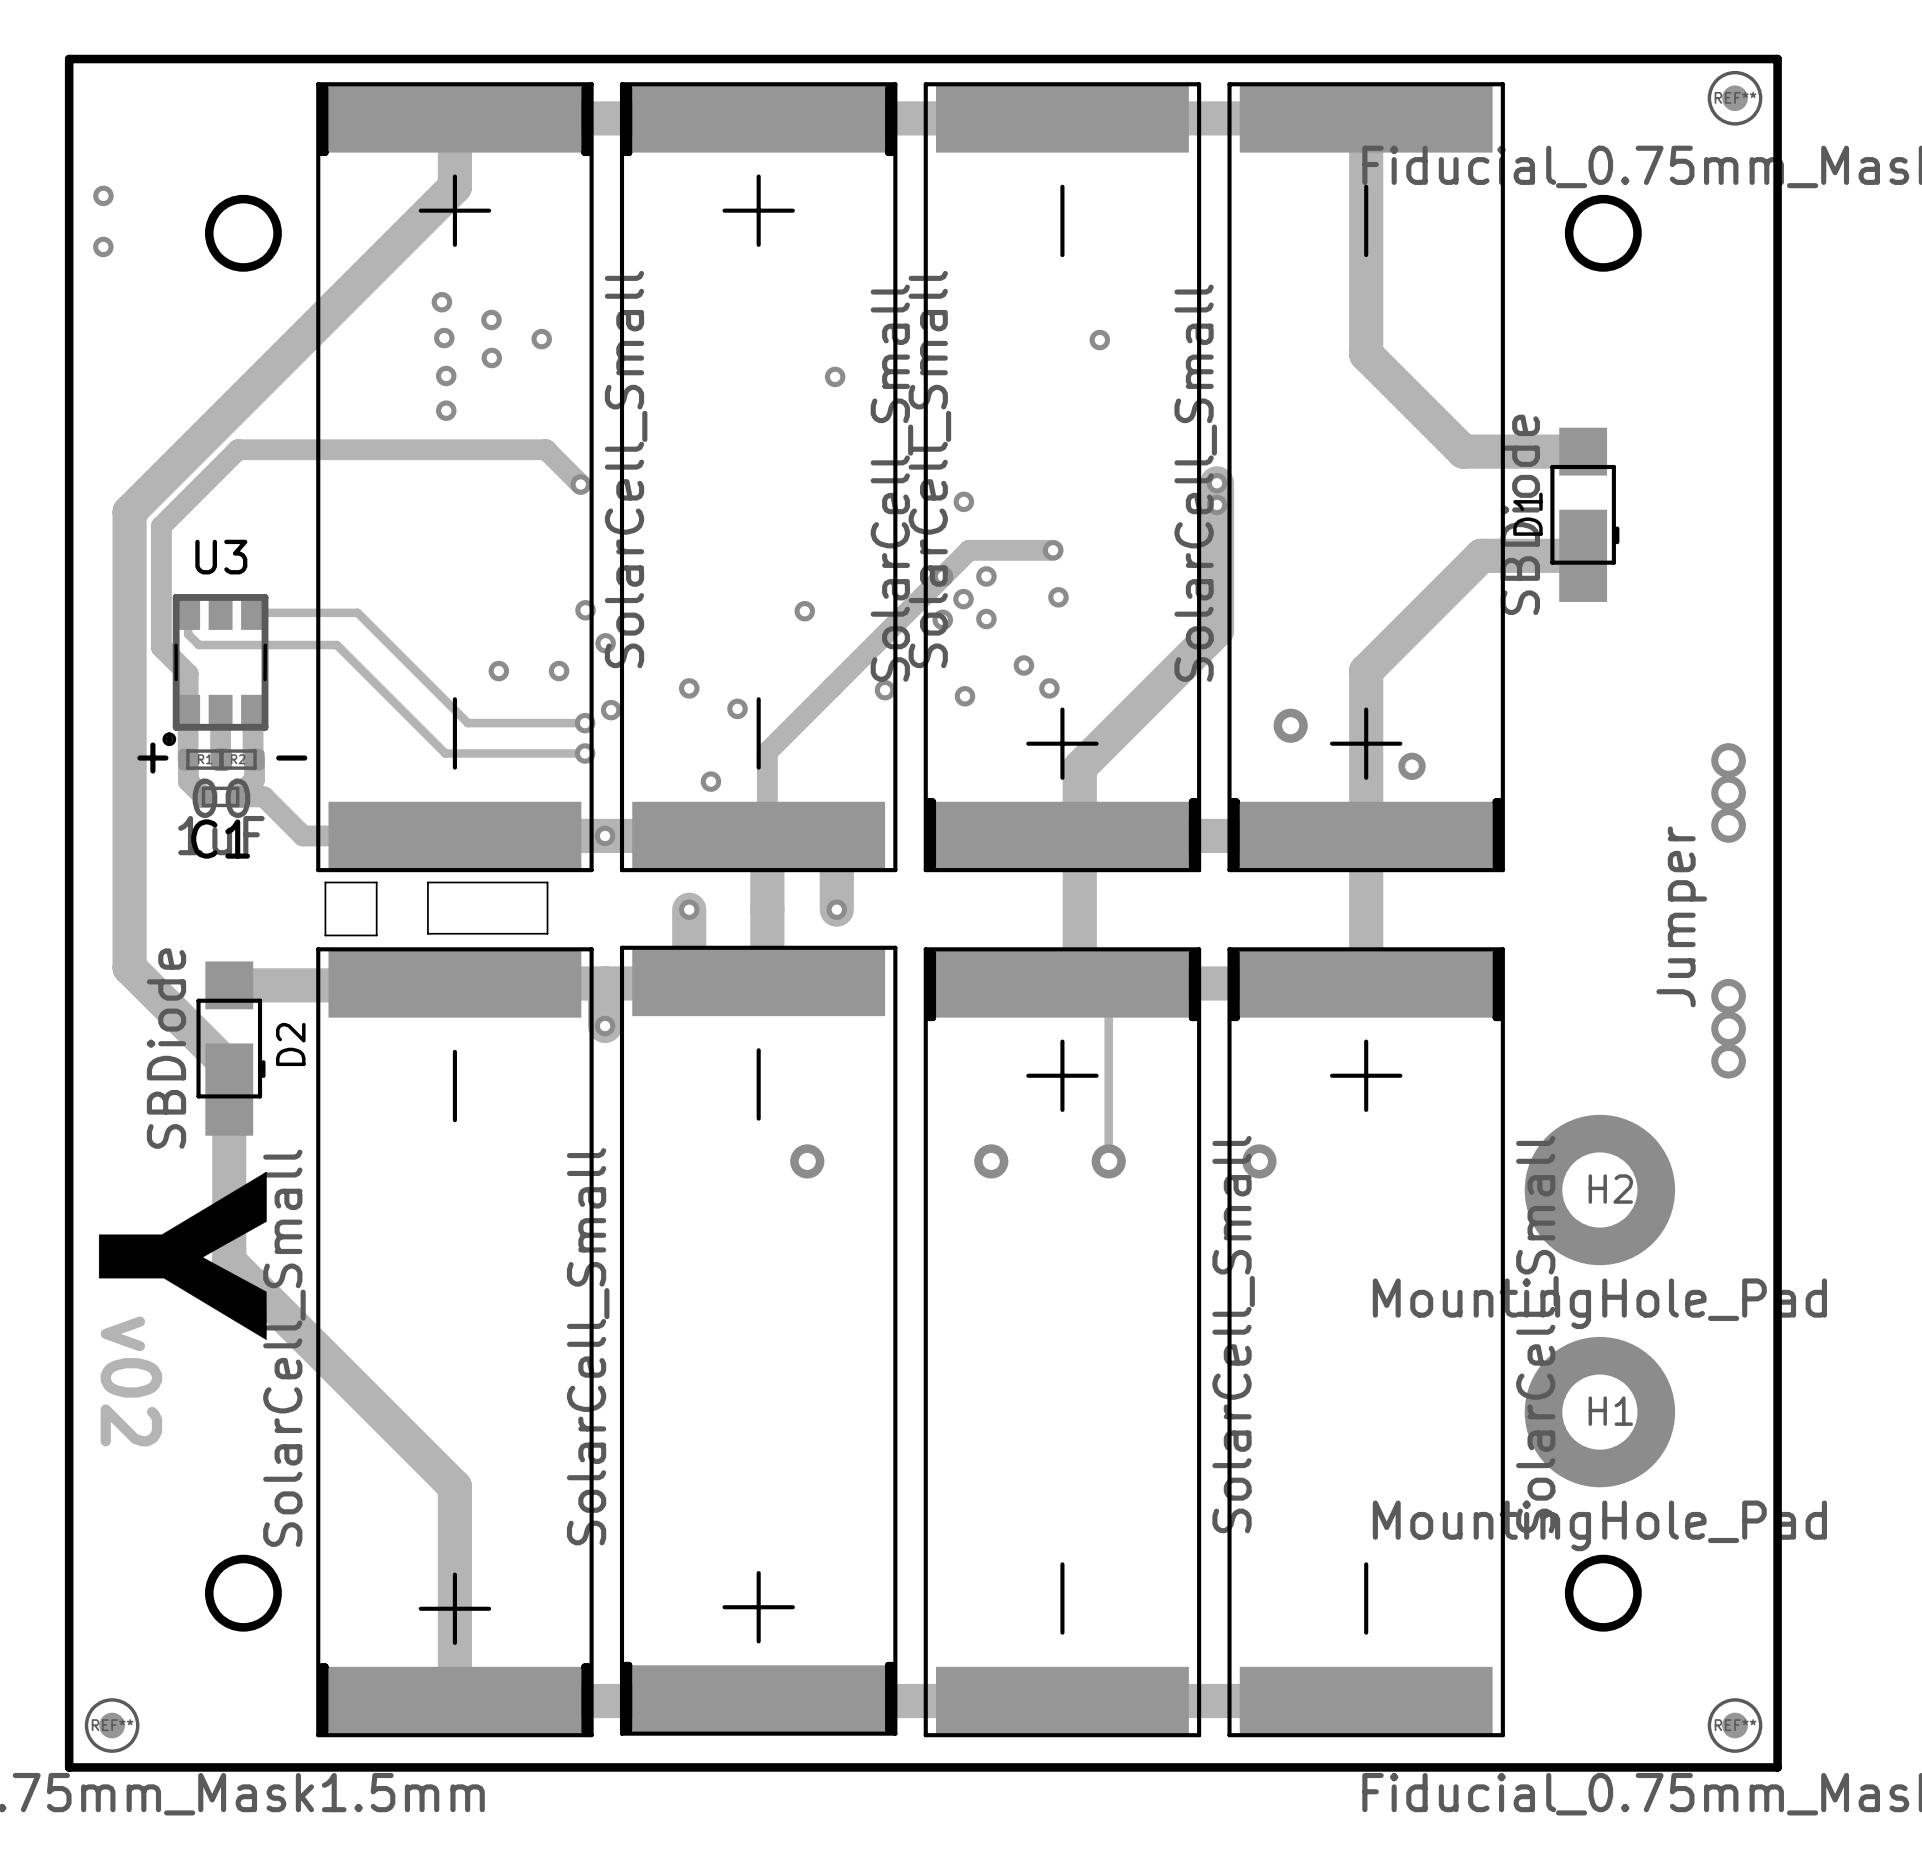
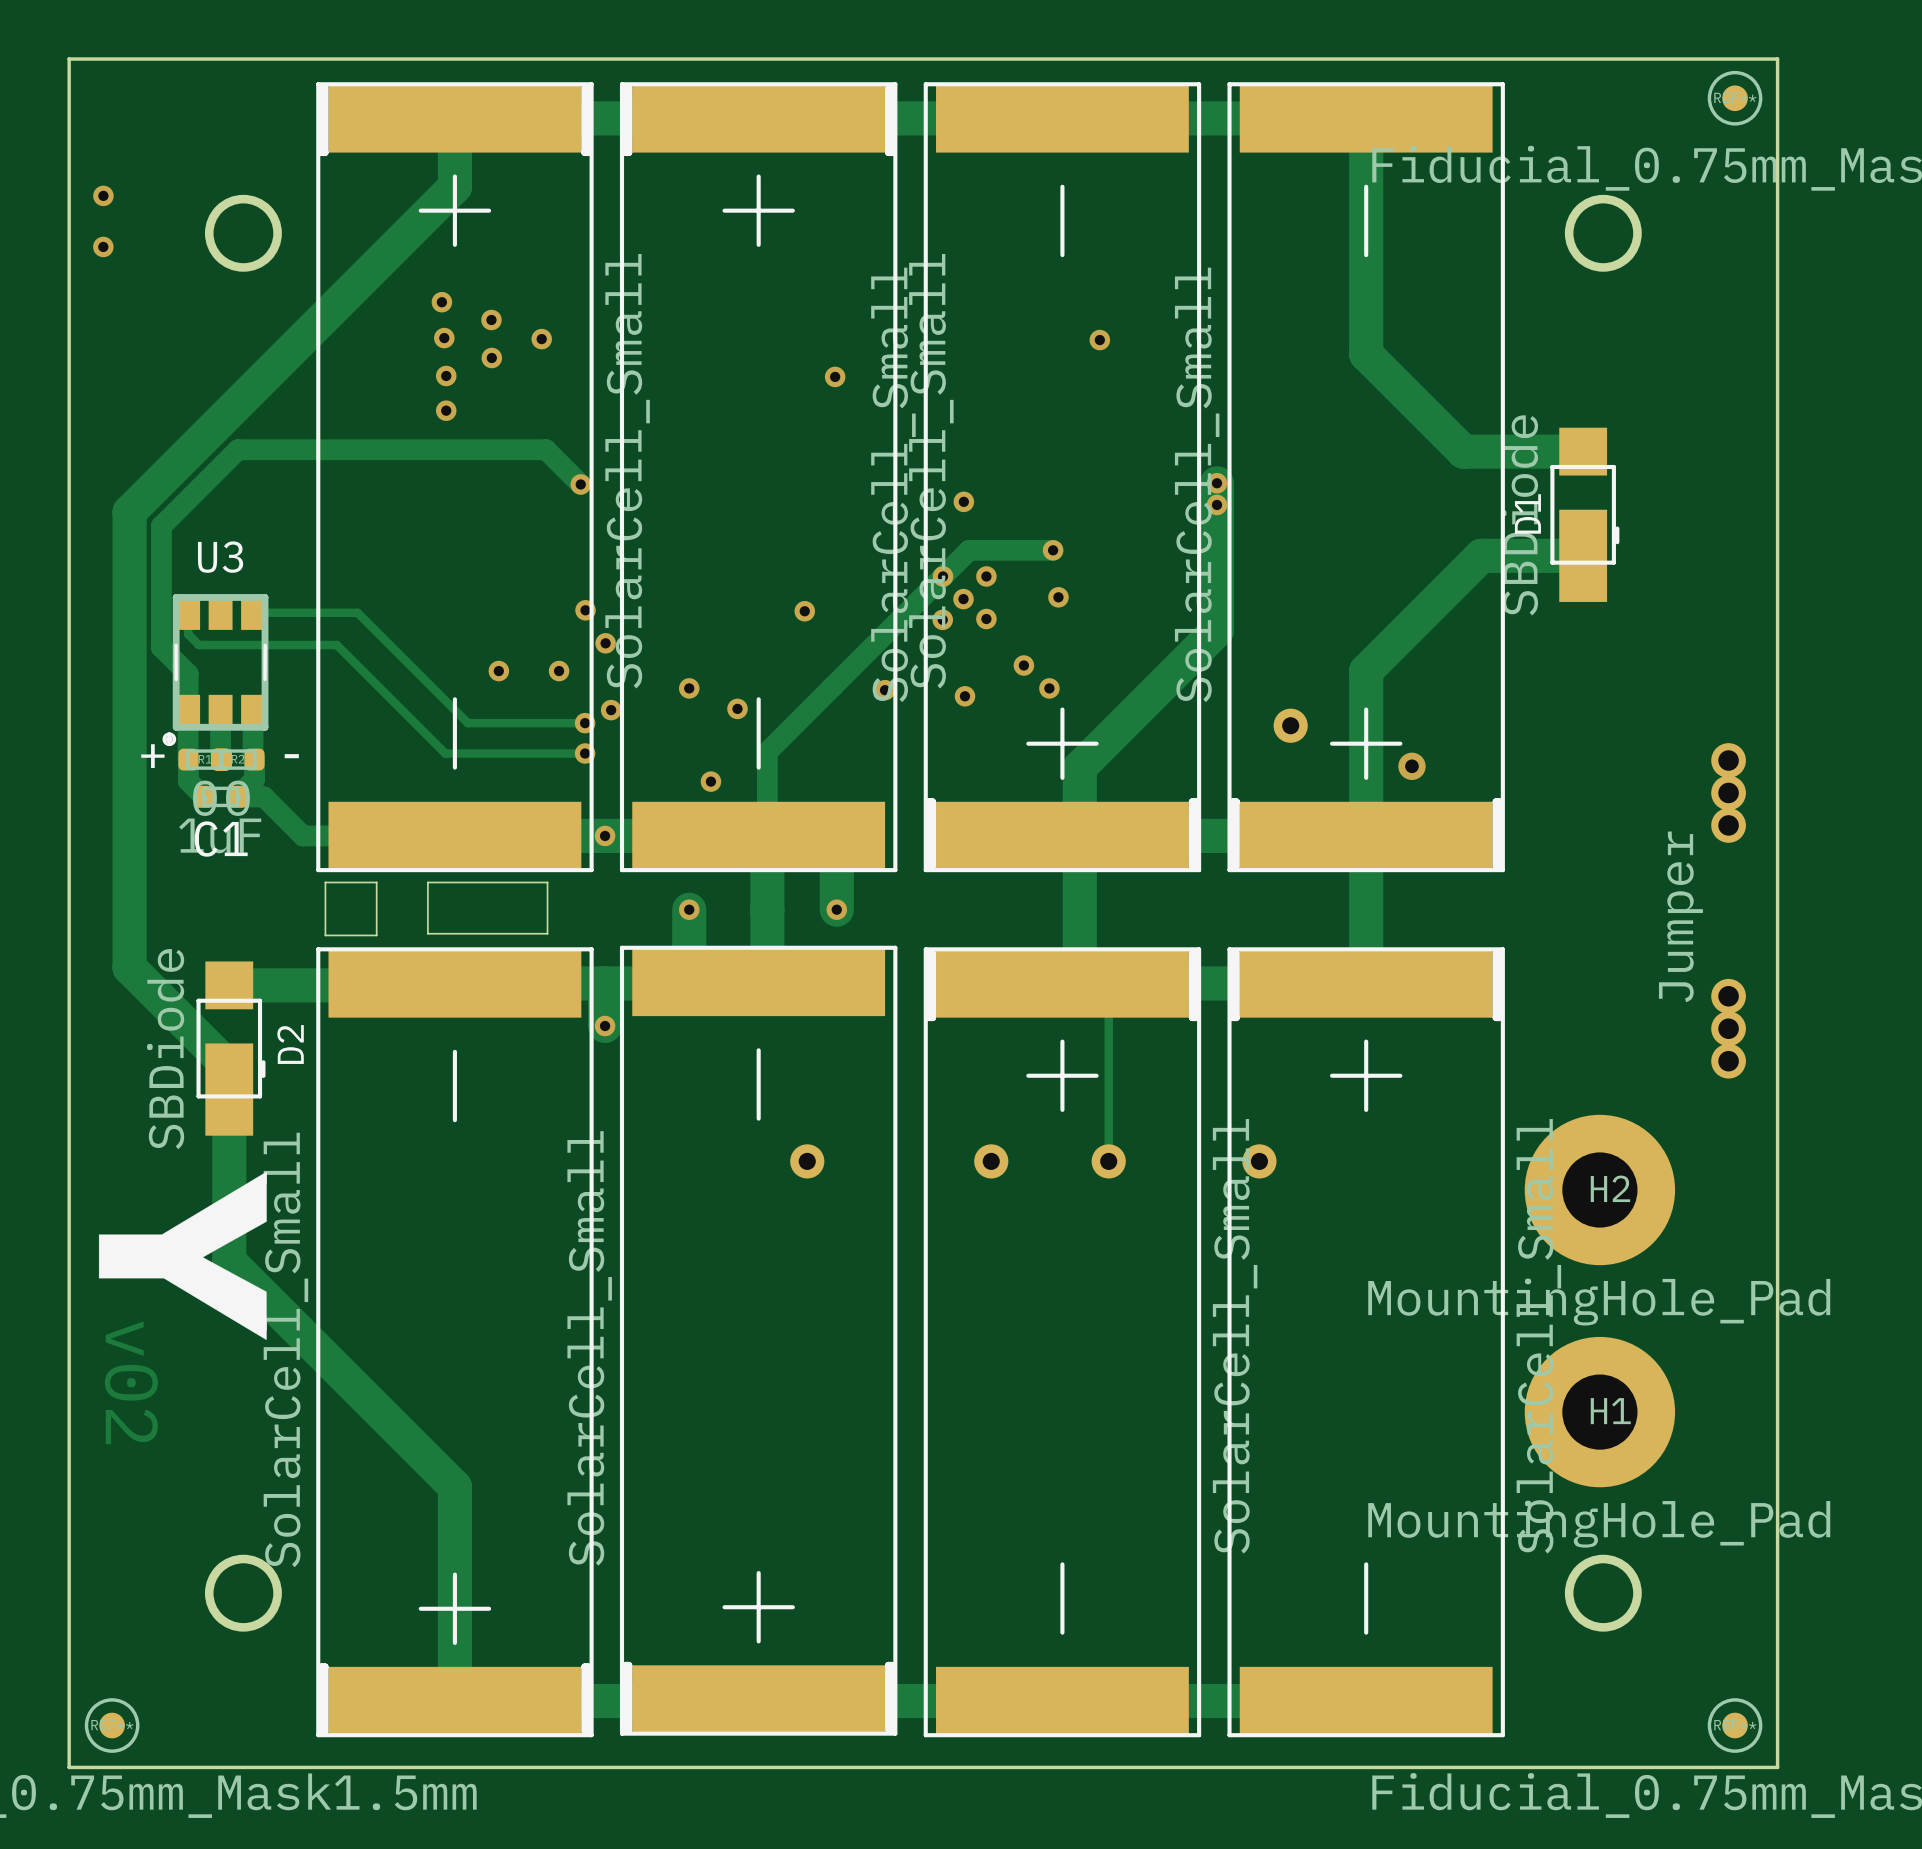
board edge width: thick (69, 59) (1777, 59) (1777, 1767) (69, 1767) (69, 59) -> thin (69, 59) (1777, 59) (1777, 1767) (69, 1767) (69, 59)

